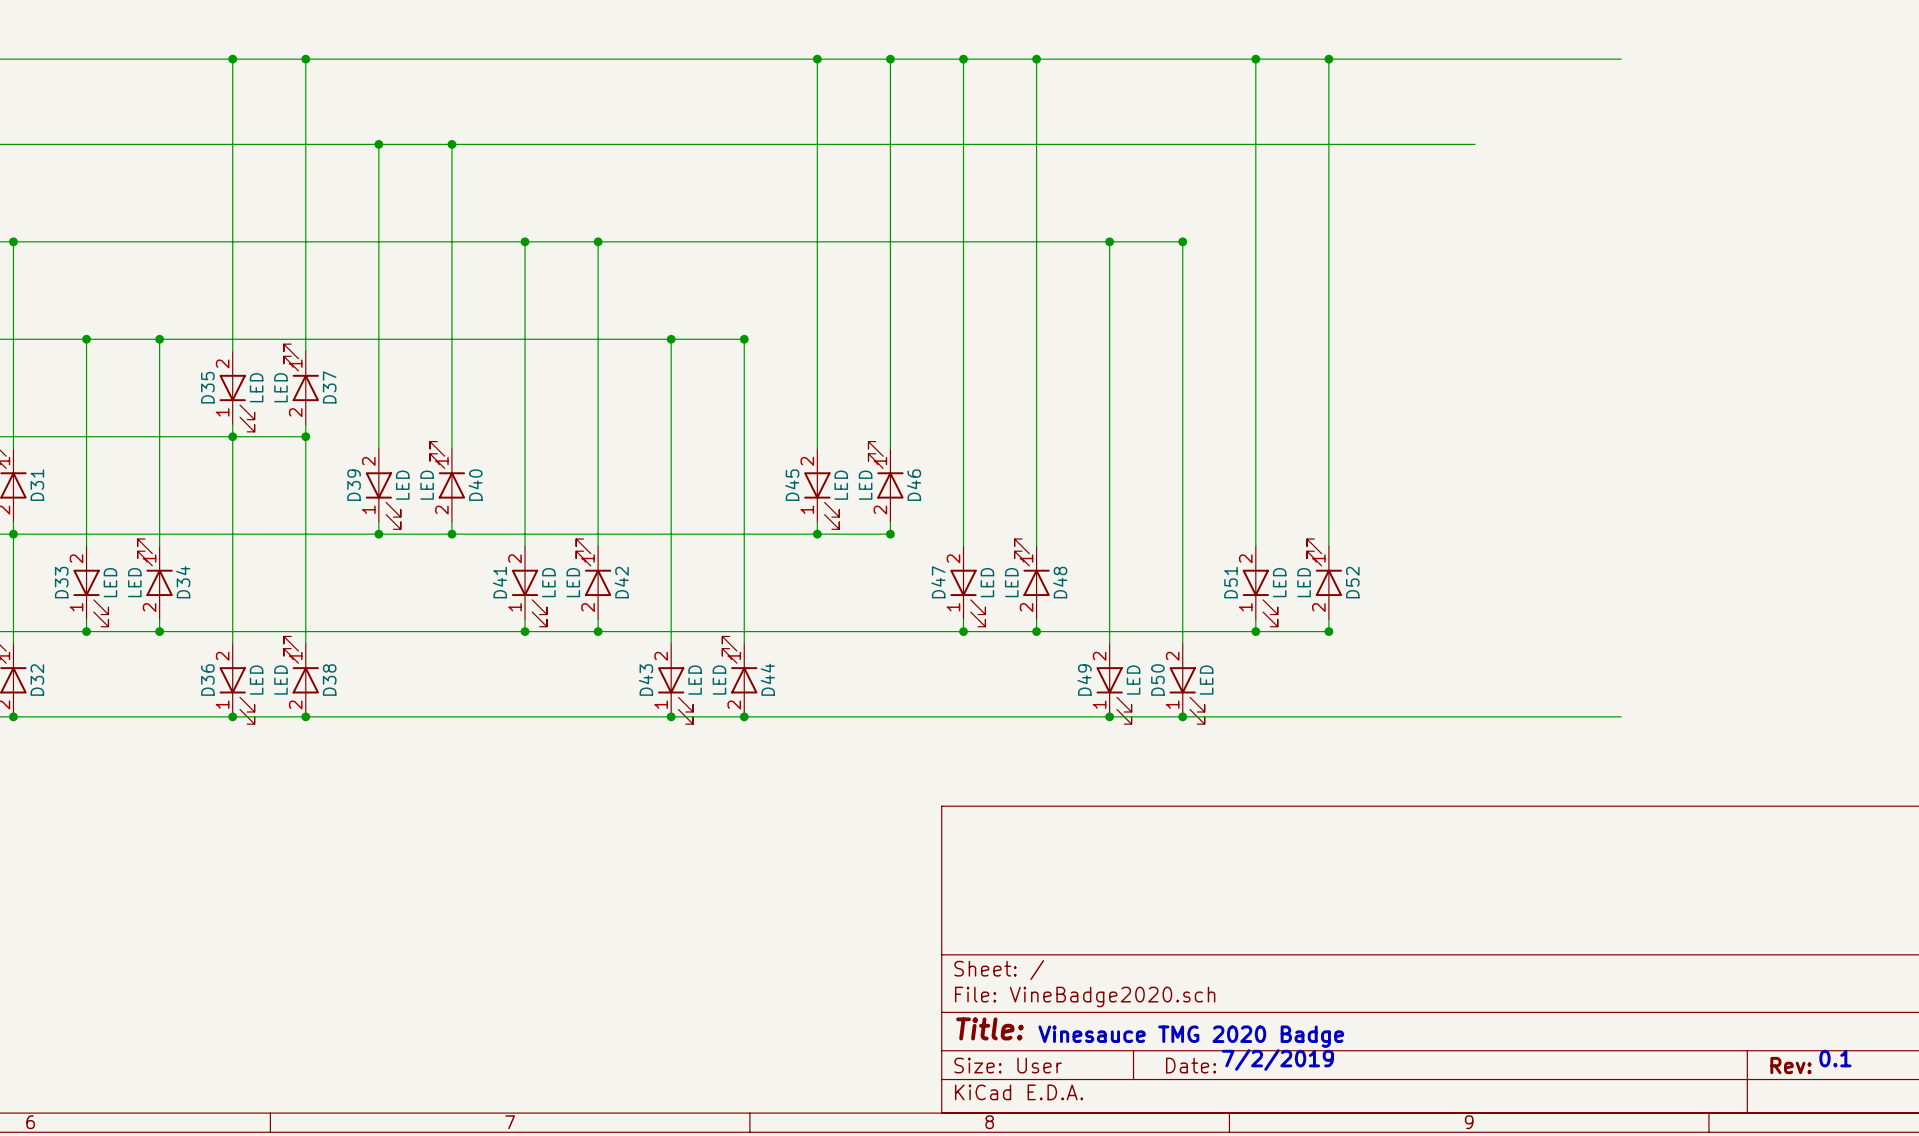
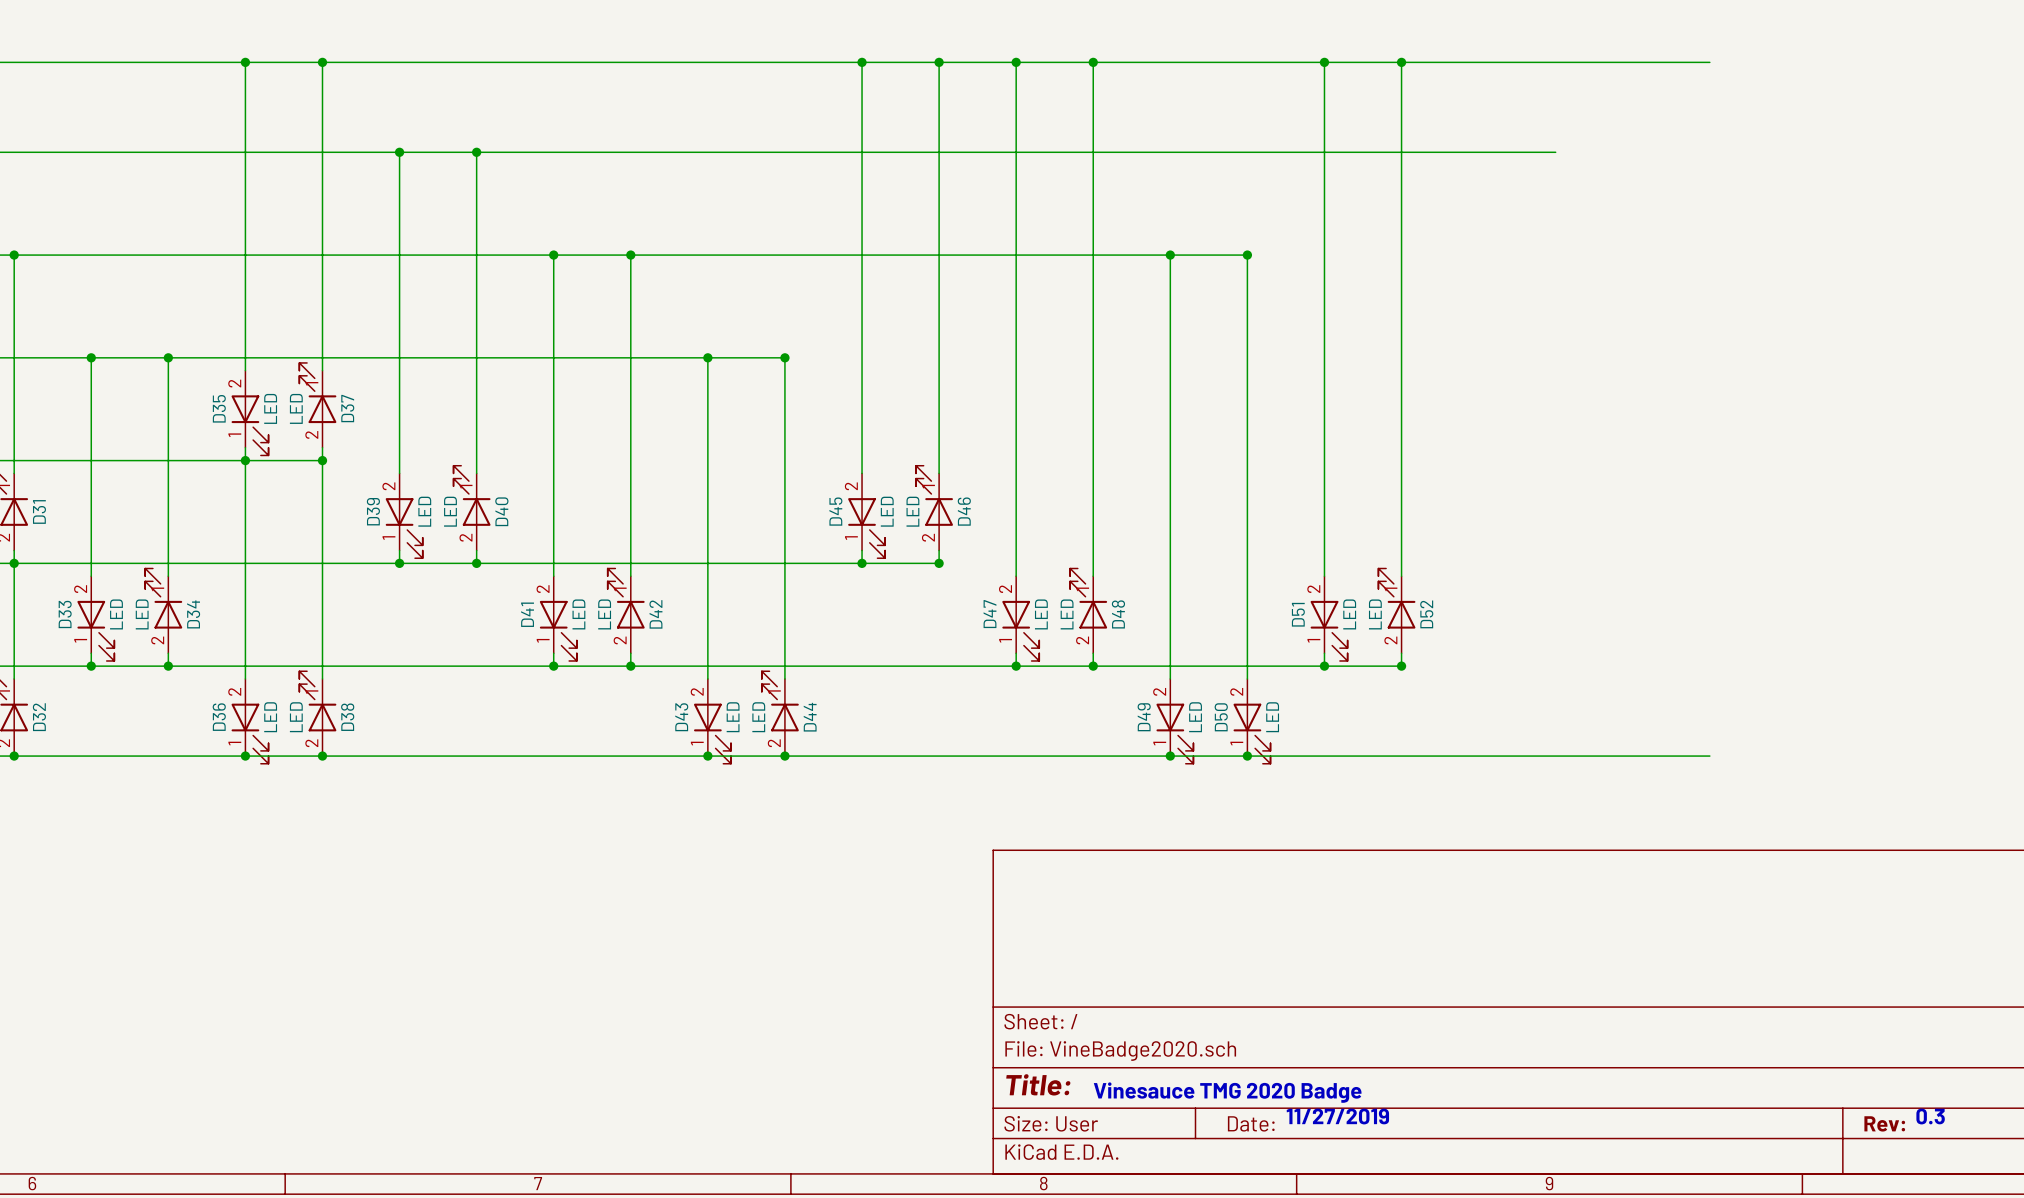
text: 0.1 (1835, 1058) -> 0.3 (1930, 1116)
text: 7/2/2019 (1277, 1059) -> 11/27/2019 (1337, 1116)

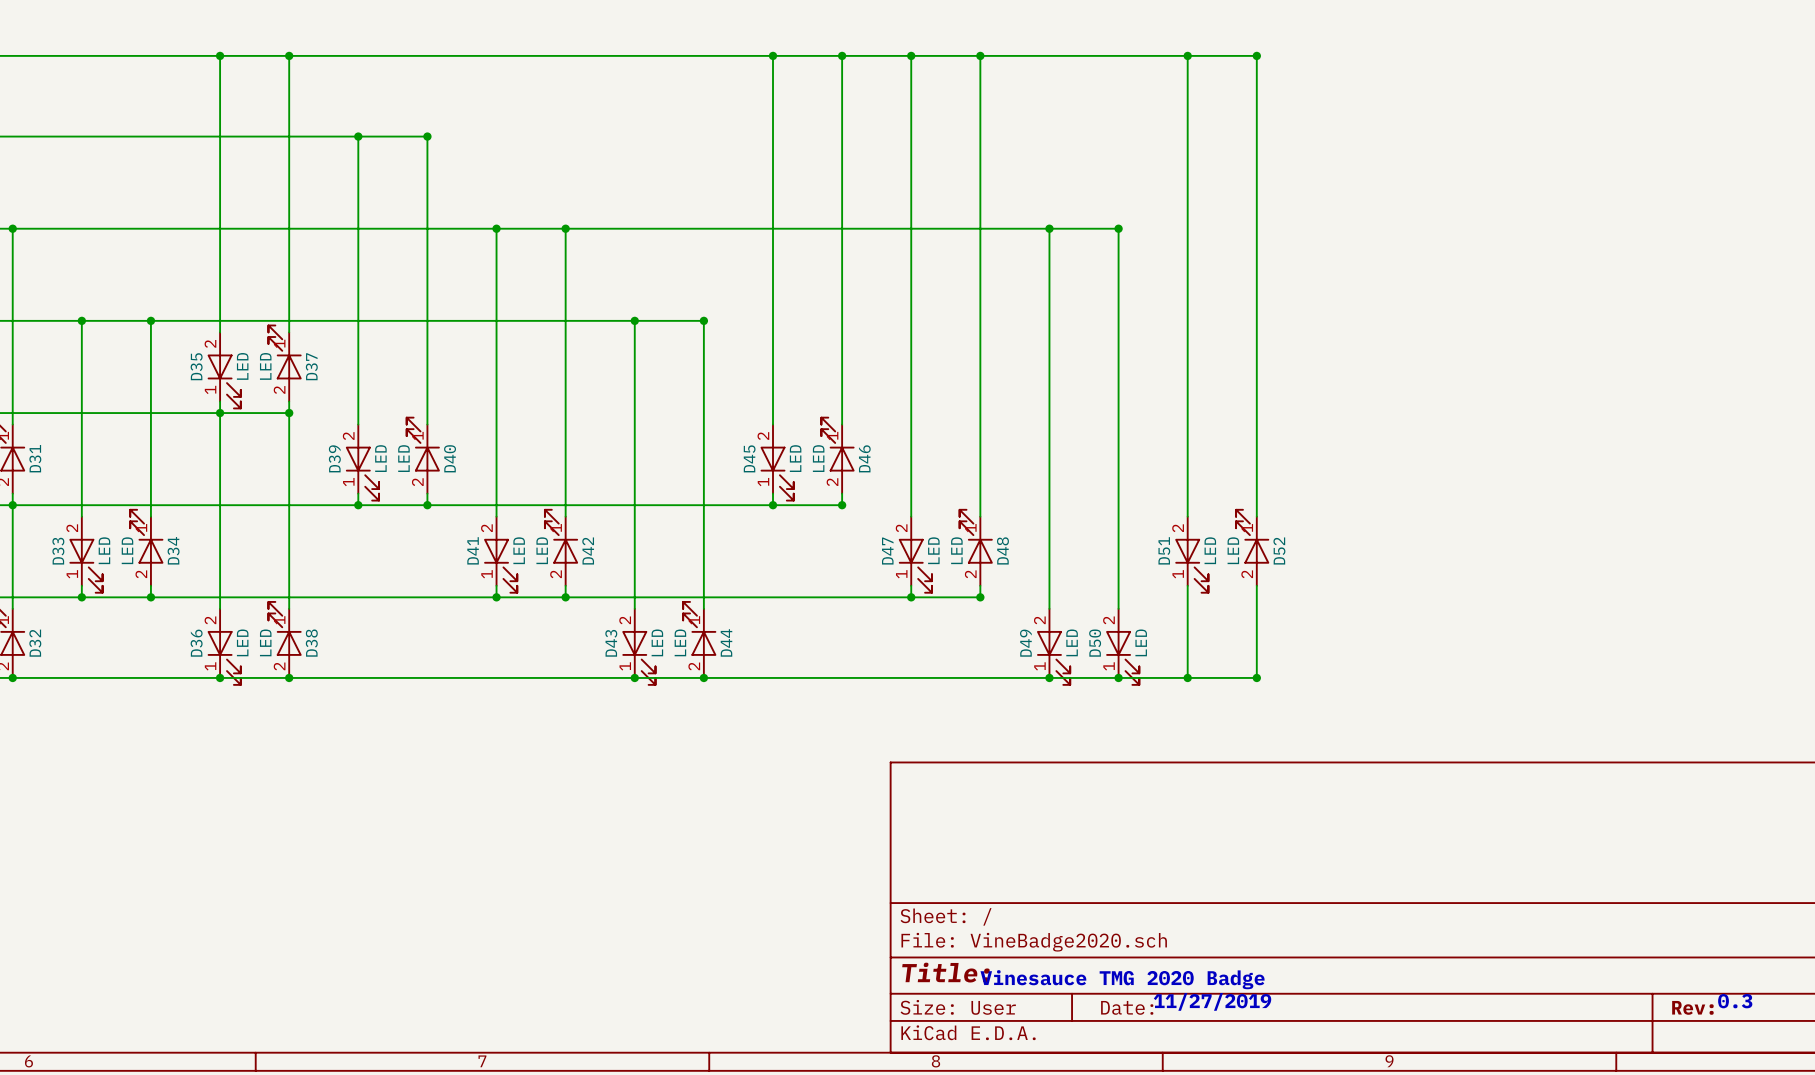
wire: (1401, 62) (1709, 62) -> none
wire: (476, 152) (1555, 152) -> none
wire: (1093, 666) (1401, 666) -> (1256, 677) (1256, 597)
wire: none -> (1187, 597) (1187, 677)
junction: (1324, 666) -> none
junction: (1401, 666) -> none
junction: none -> (1187, 677)
wire: (1401, 756) (1709, 756) -> none
junction: none -> (1256, 677)

